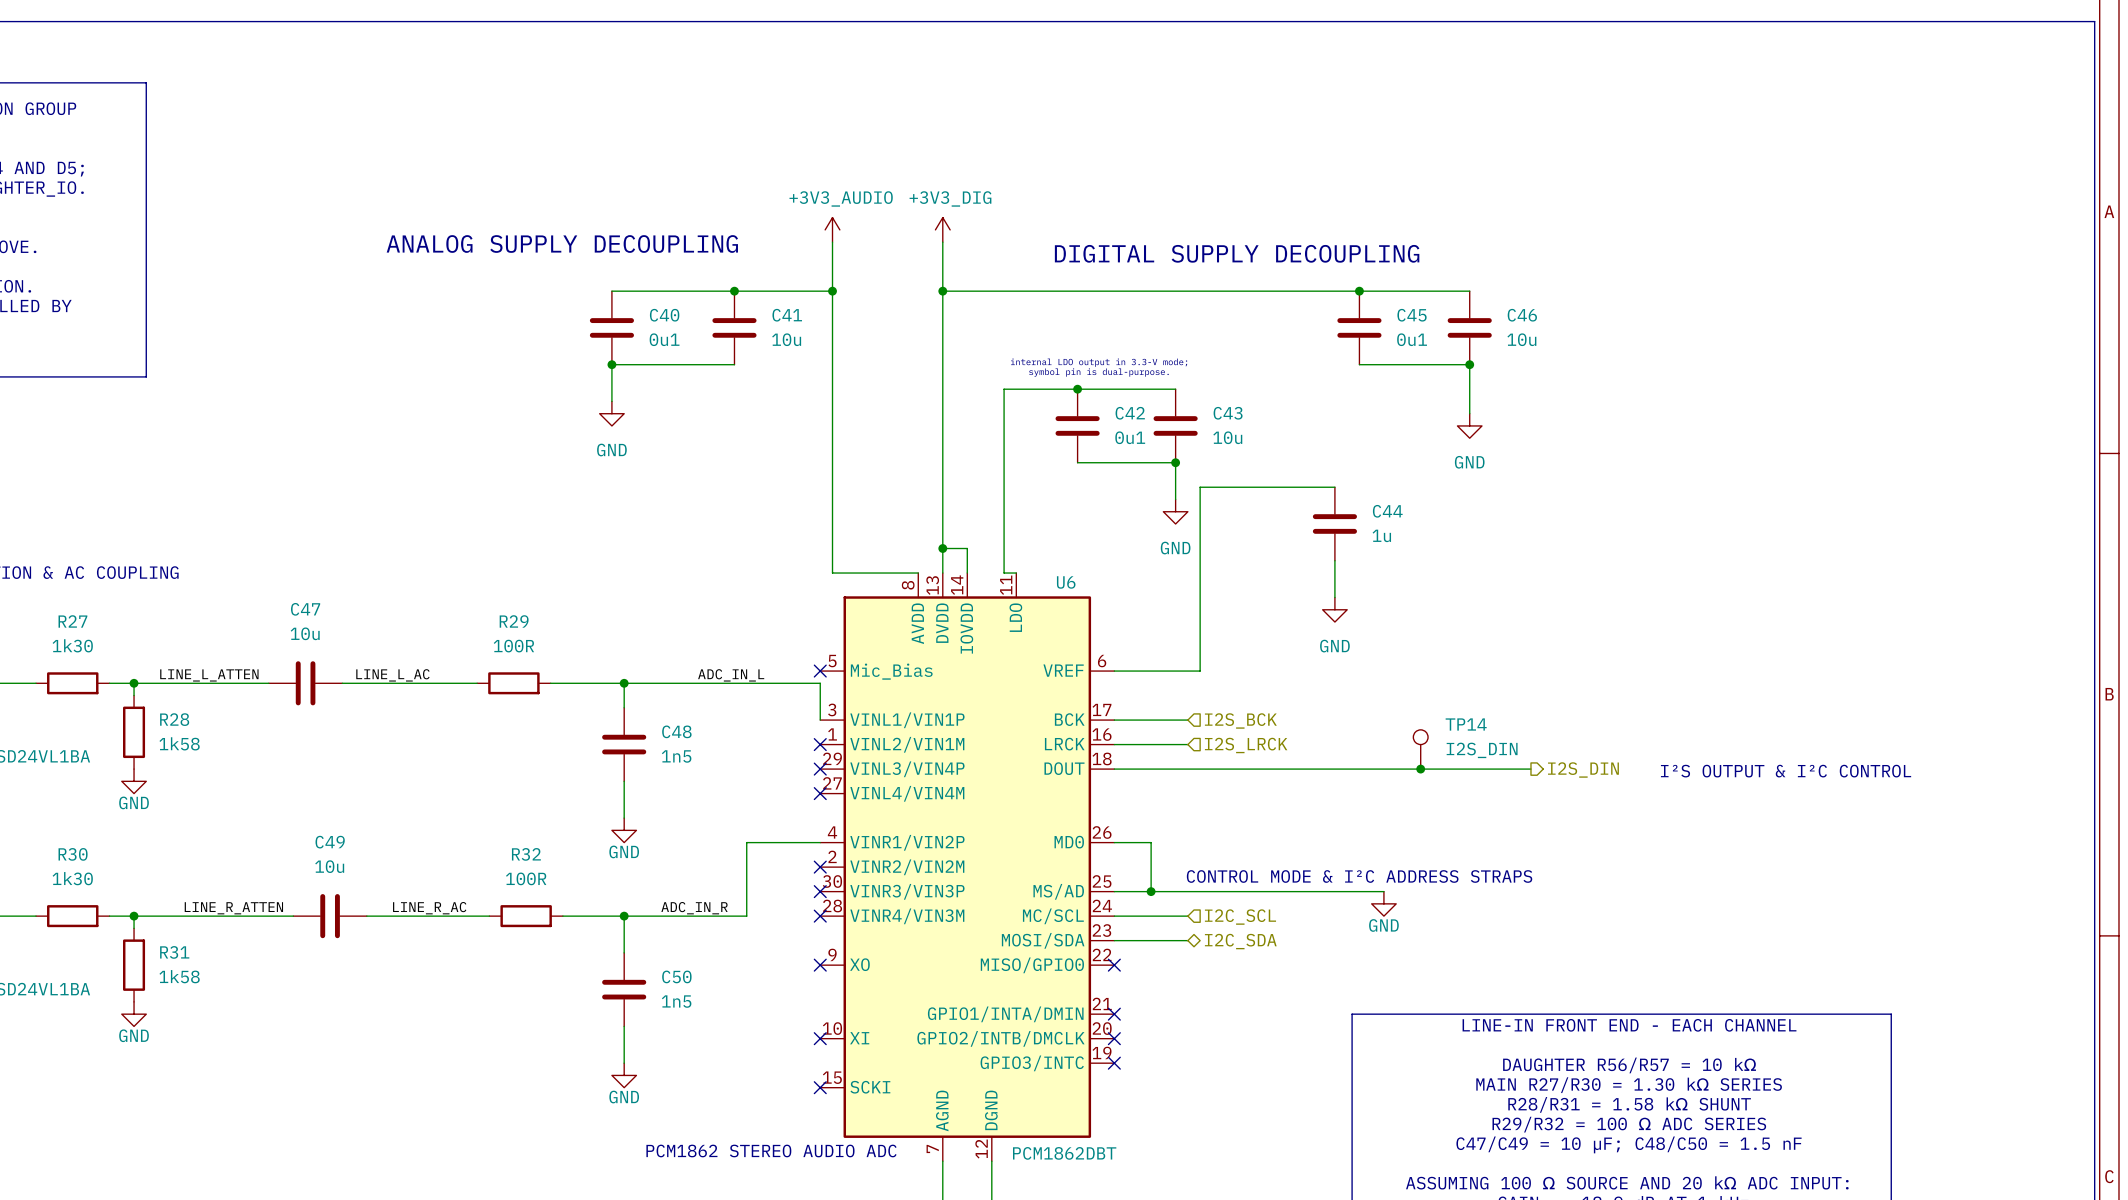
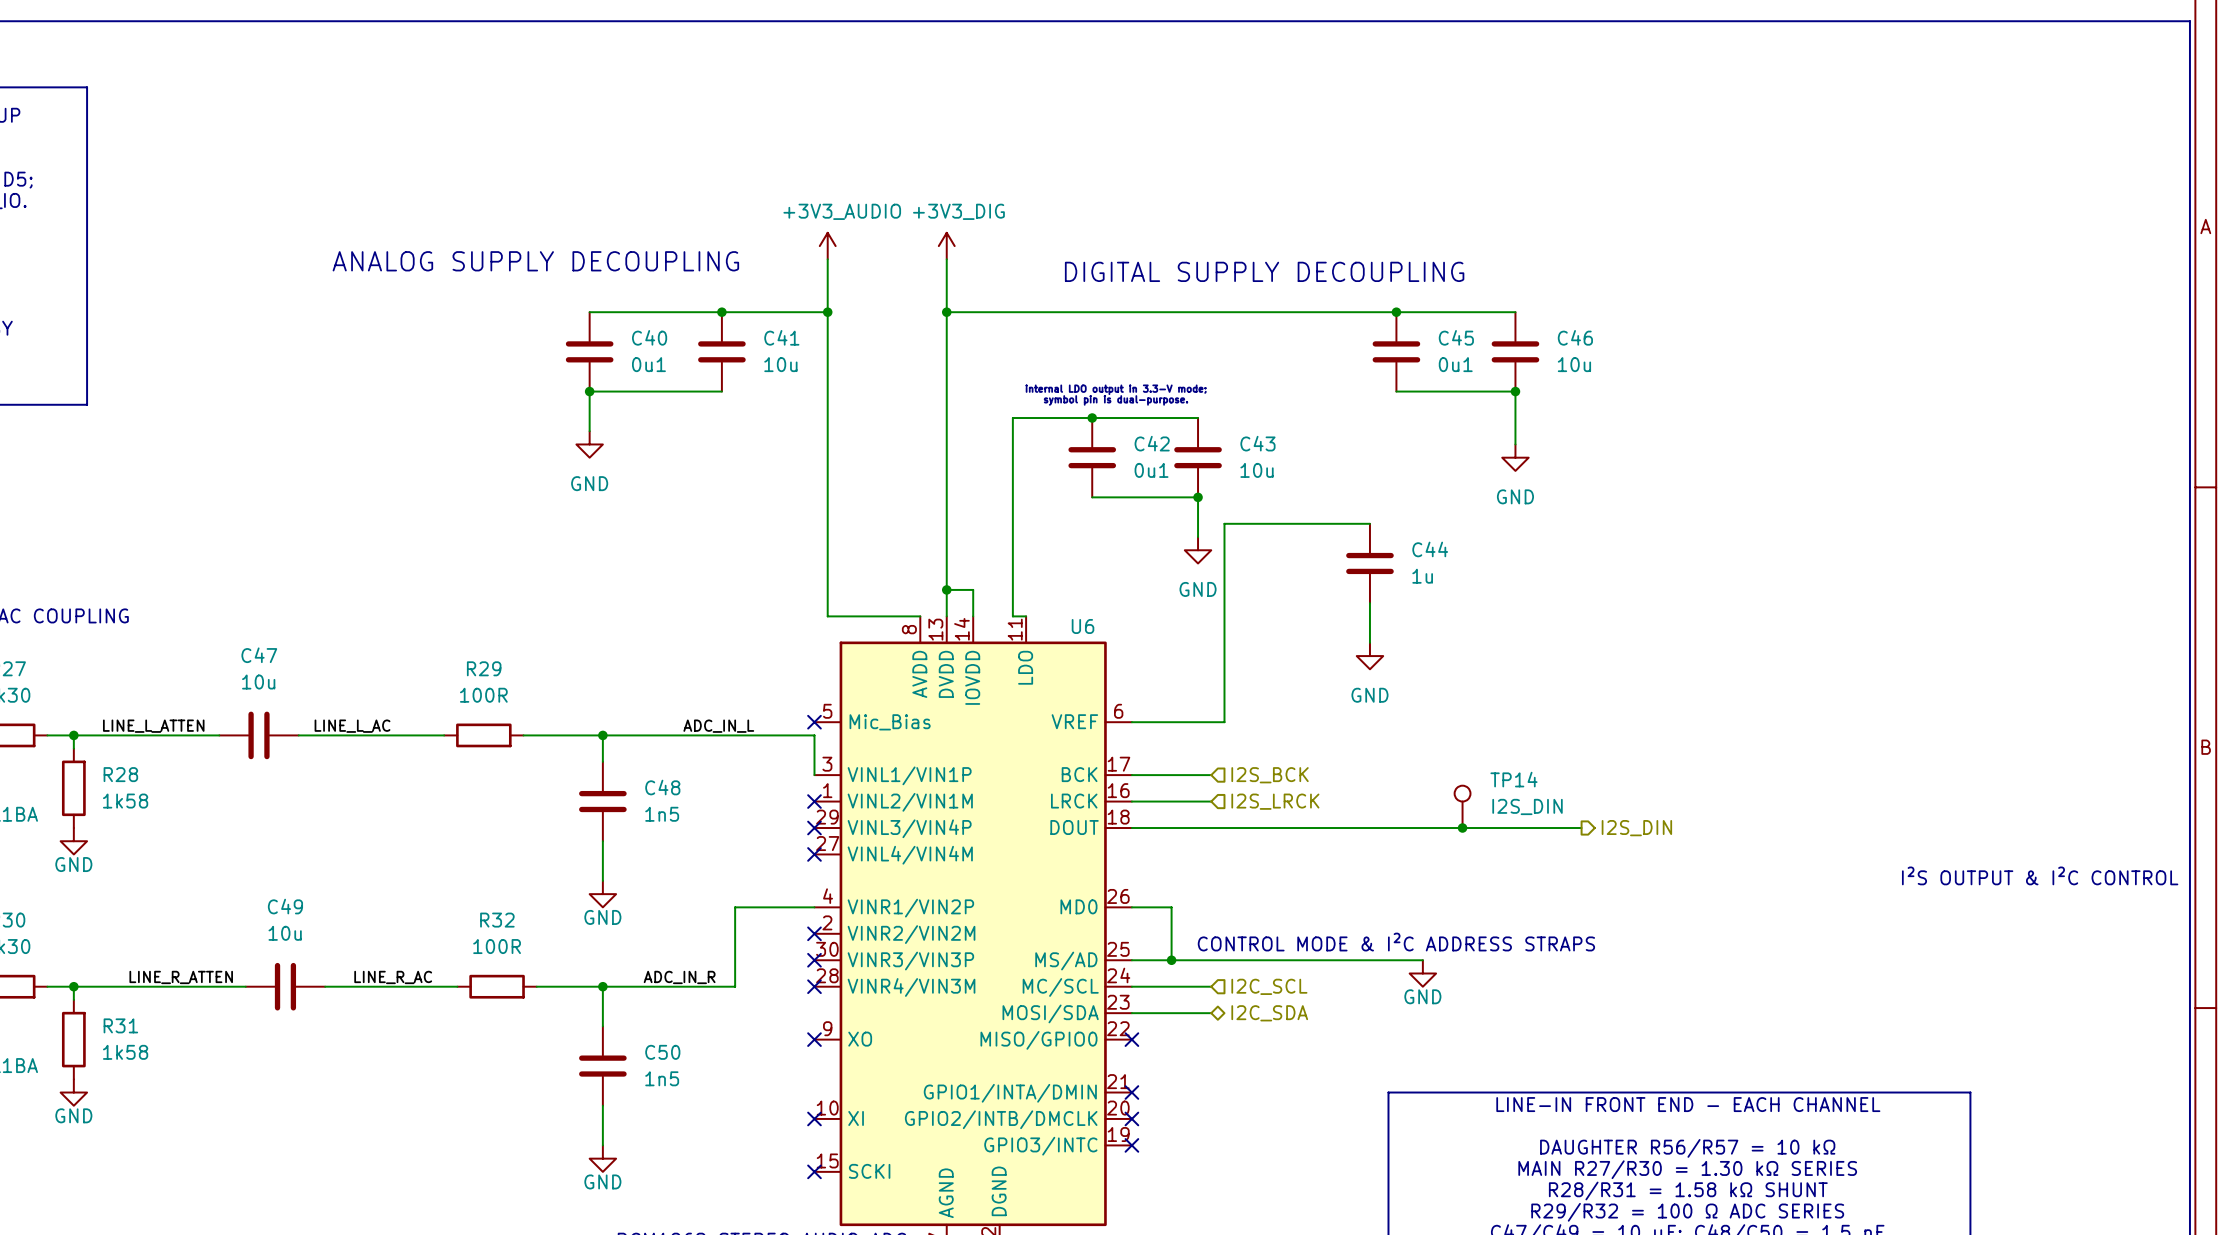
text position: I²S OUTPUT & I²C CONTROL (1786, 771) -> I²S OUTPUT & I²C CONTROL (2040, 875)

